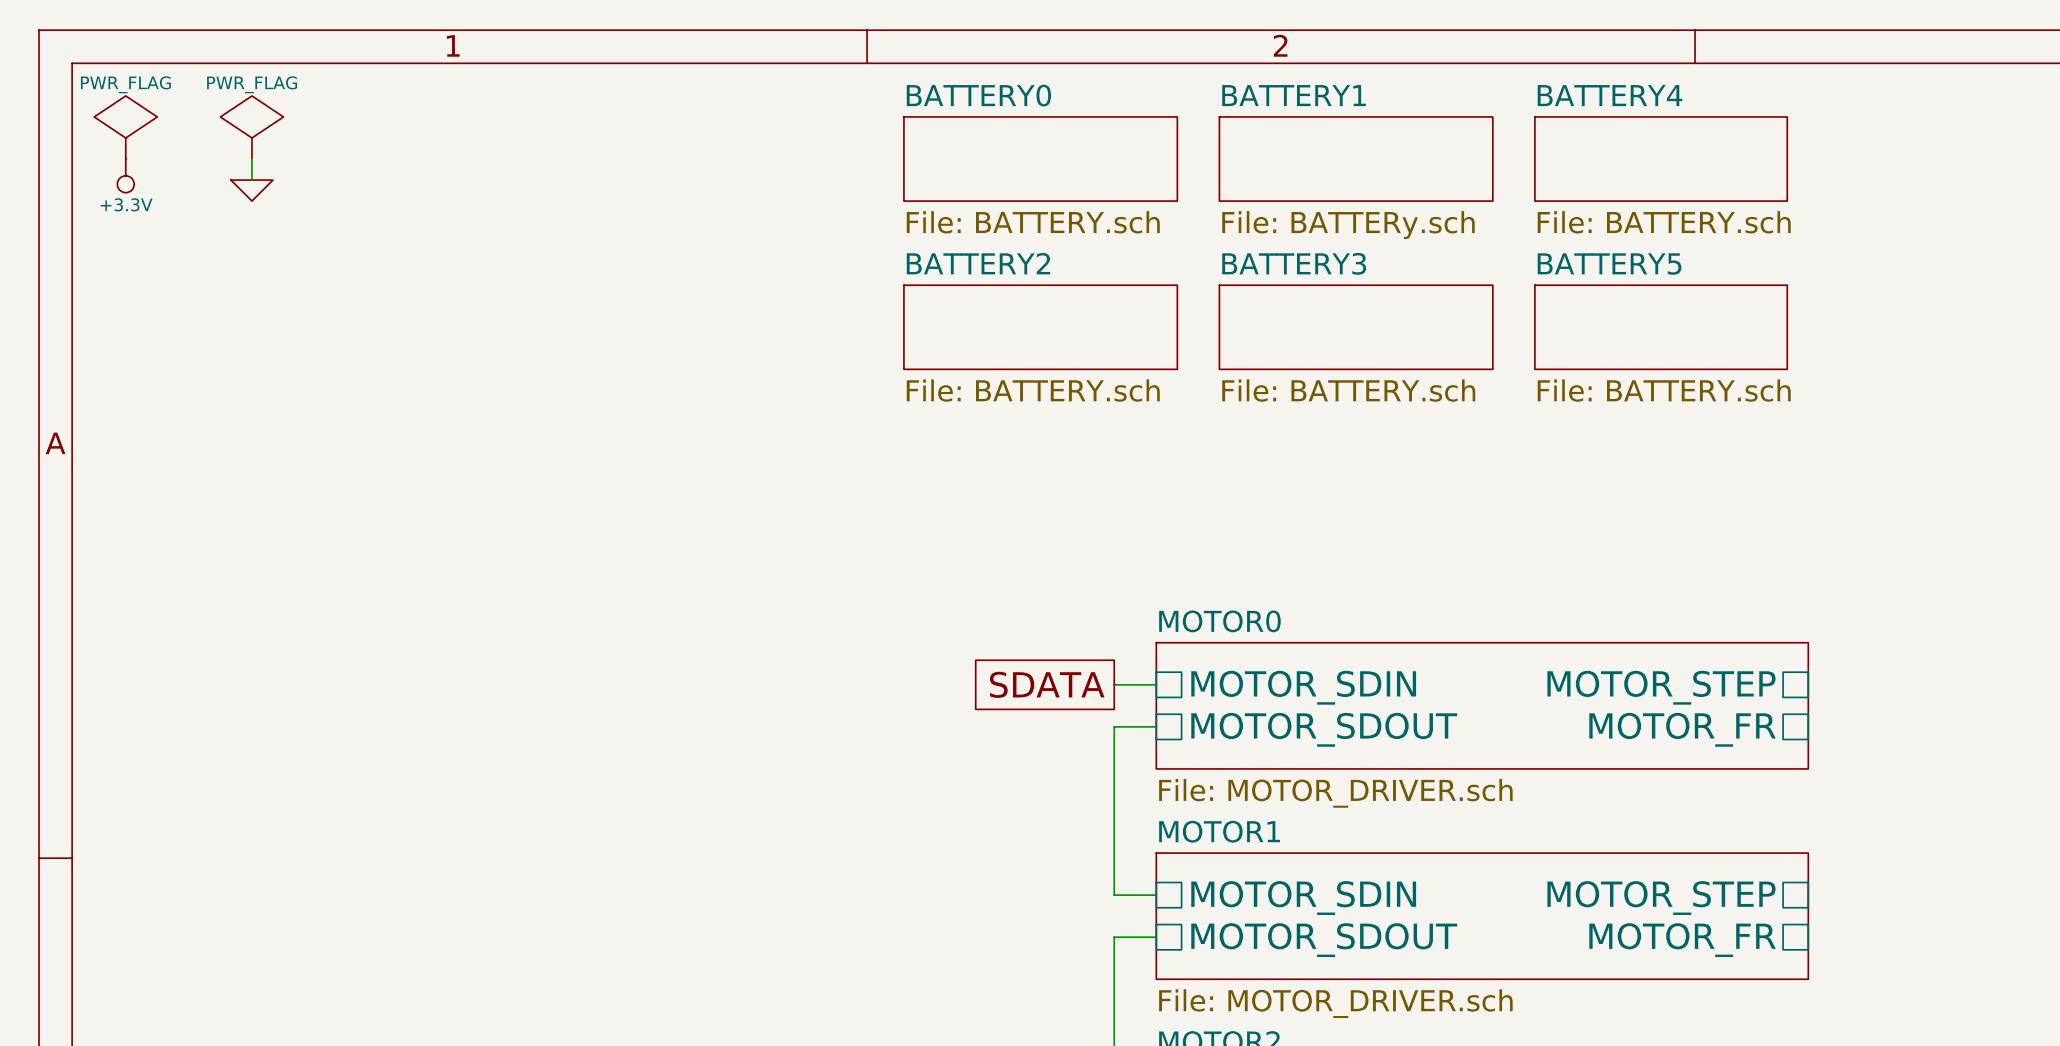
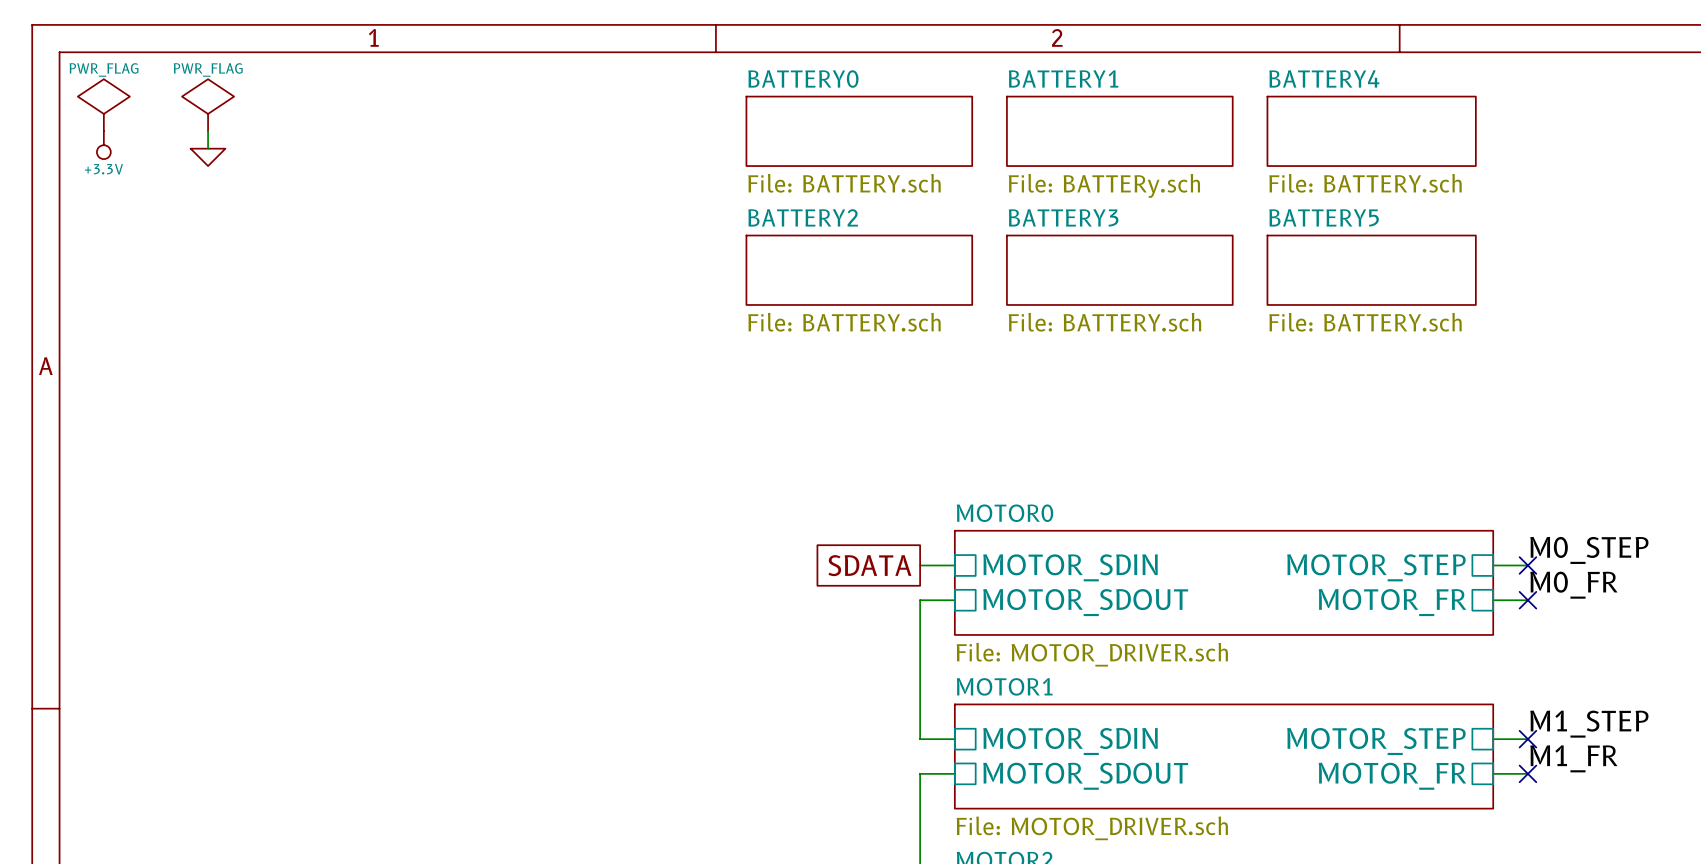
label: none -> M0_STEP (1589, 550)
wire: none -> (1493, 565) (1527, 565)
no-connect mark: none -> (1527, 565)
label: none -> M0_FR (1573, 585)
wire: none -> (1493, 600) (1527, 600)
no-connect mark: none -> (1527, 600)
label: none -> M1_STEP (1589, 724)
wire: none -> (1493, 739) (1527, 739)
no-connect mark: none -> (1527, 739)
label: none -> M1_FR (1573, 758)
wire: none -> (1493, 773) (1527, 773)
no-connect mark: none -> (1527, 773)

